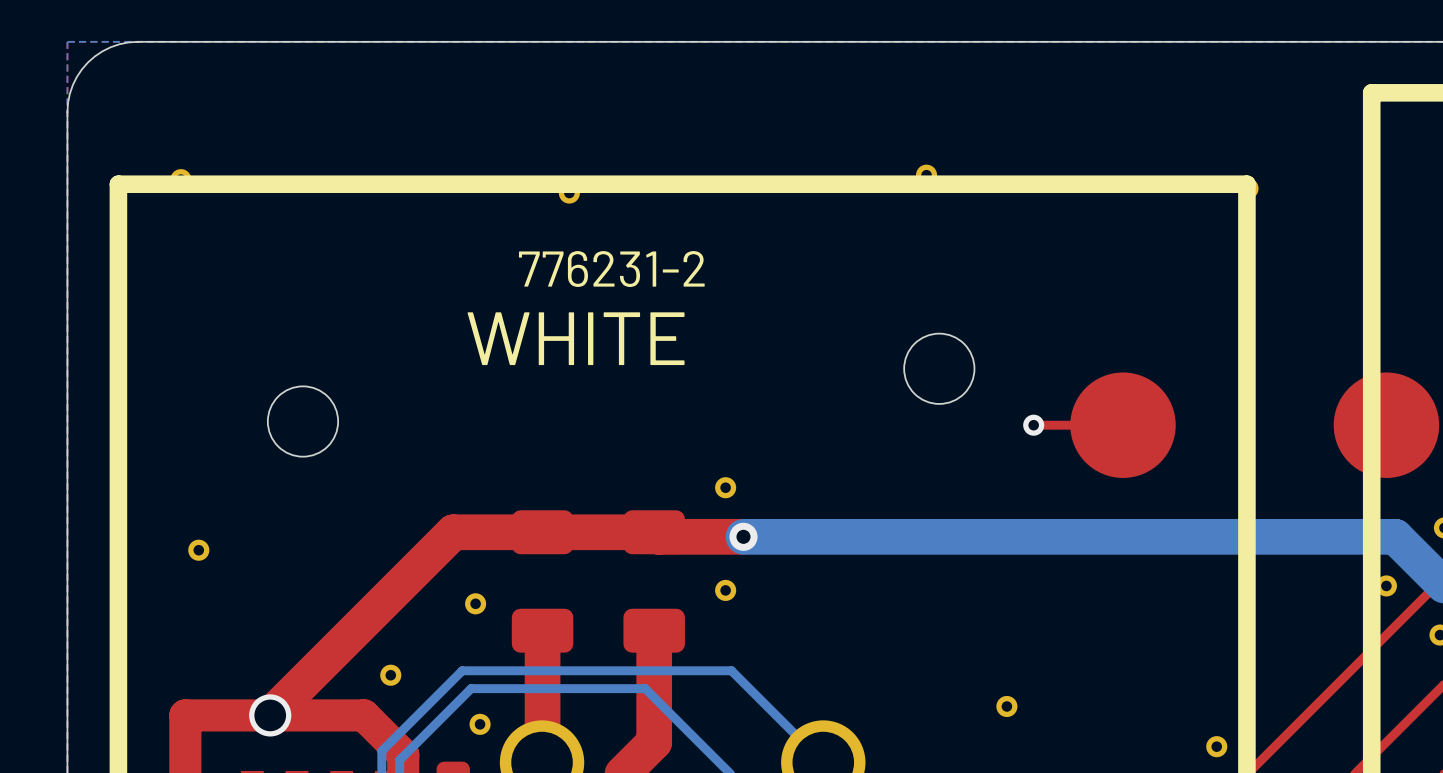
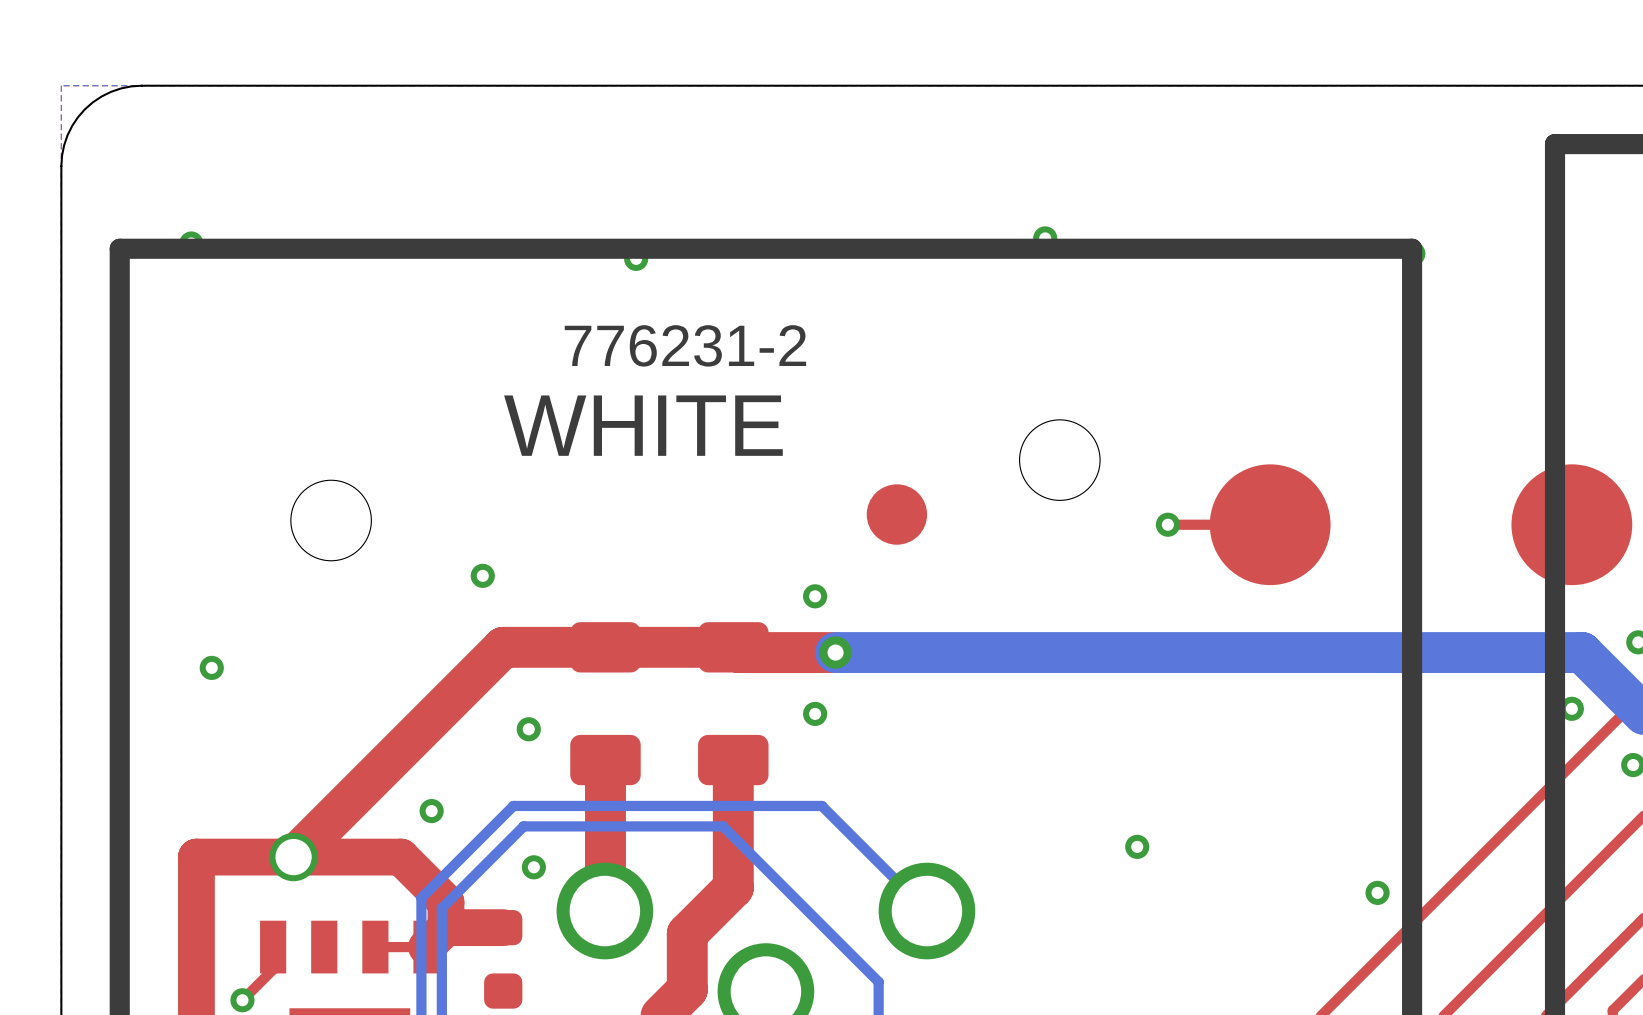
part: none -> (896, 514)
part: none -> (482, 575)

